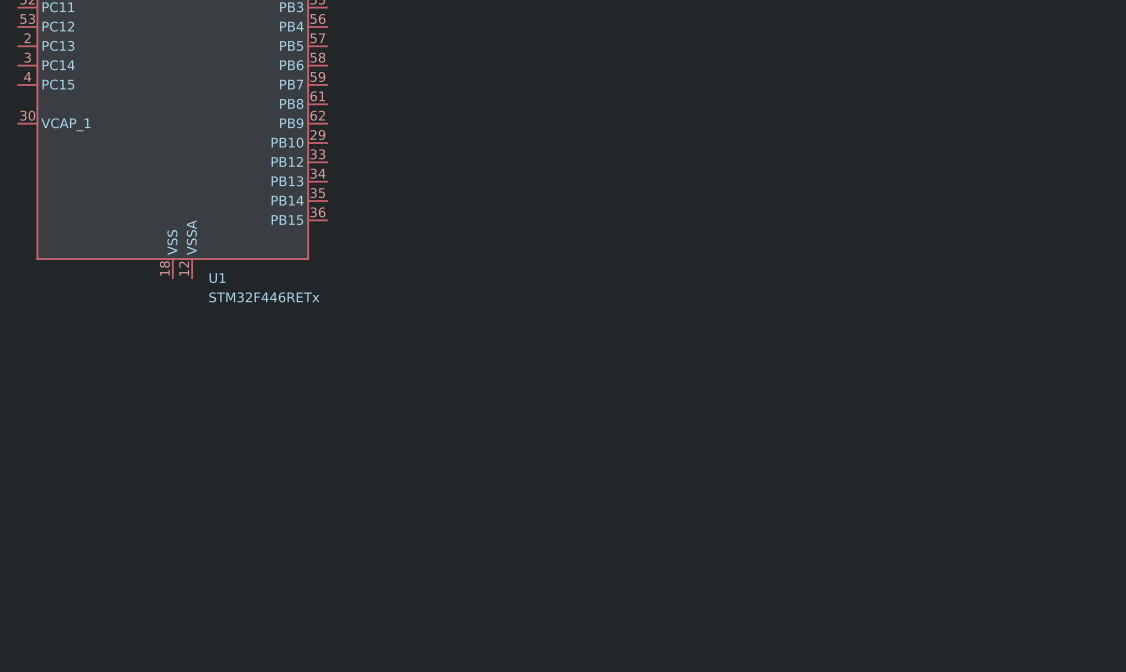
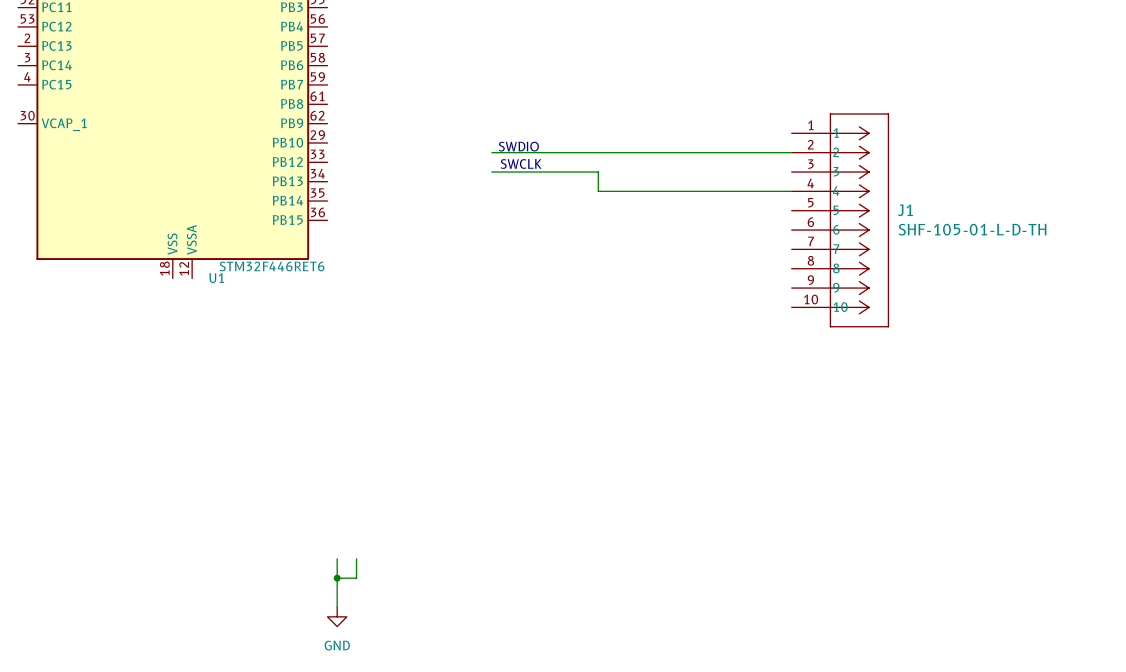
text: none -> SWDIO (518, 146)
wire: none -> (491, 152) (791, 152)
text: none -> SWCLK (521, 163)
wire: none -> (491, 172) (598, 172) (598, 191) (791, 191)
J1: none -> SHF-105-01-L-D-TH (840, 220)
U1 value: STM32F446RETx (264, 297) -> STM32F446RET6 (272, 266)
wire: none -> (337, 558) (337, 607)
wire: none -> (356, 558) (356, 578) (337, 578)
junction: none -> (337, 578)
power symbol: none -> GND (337, 616)

